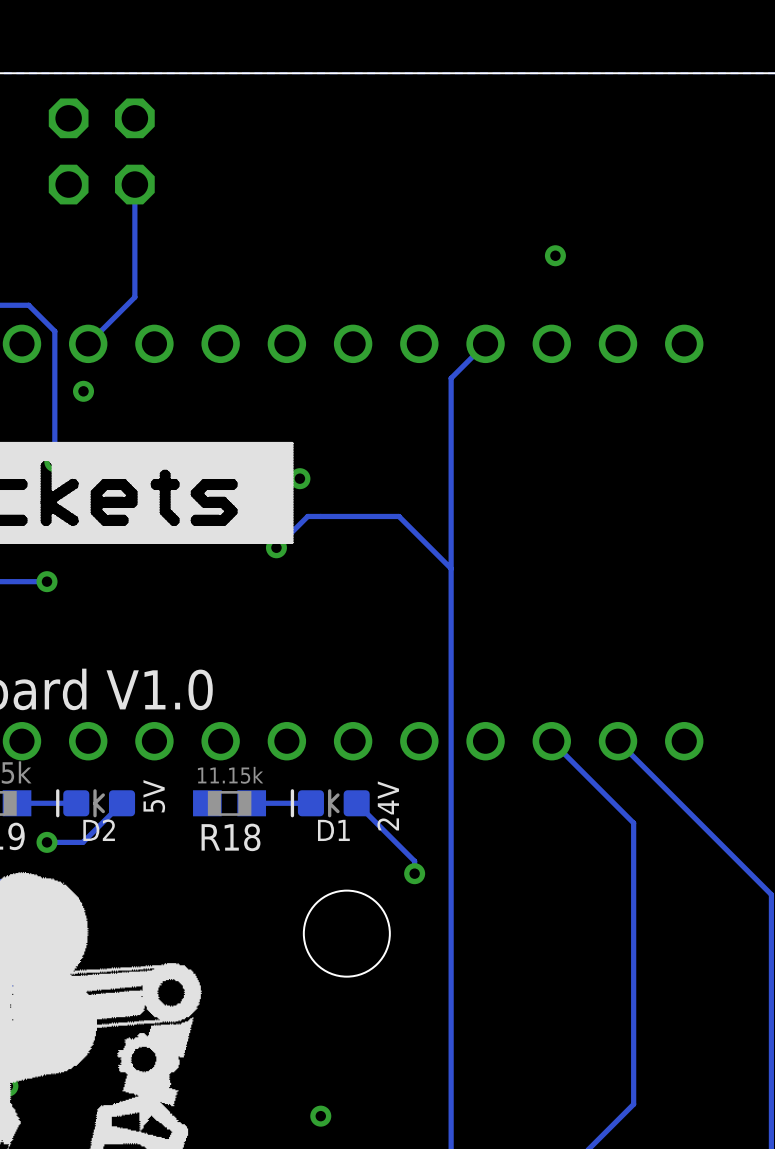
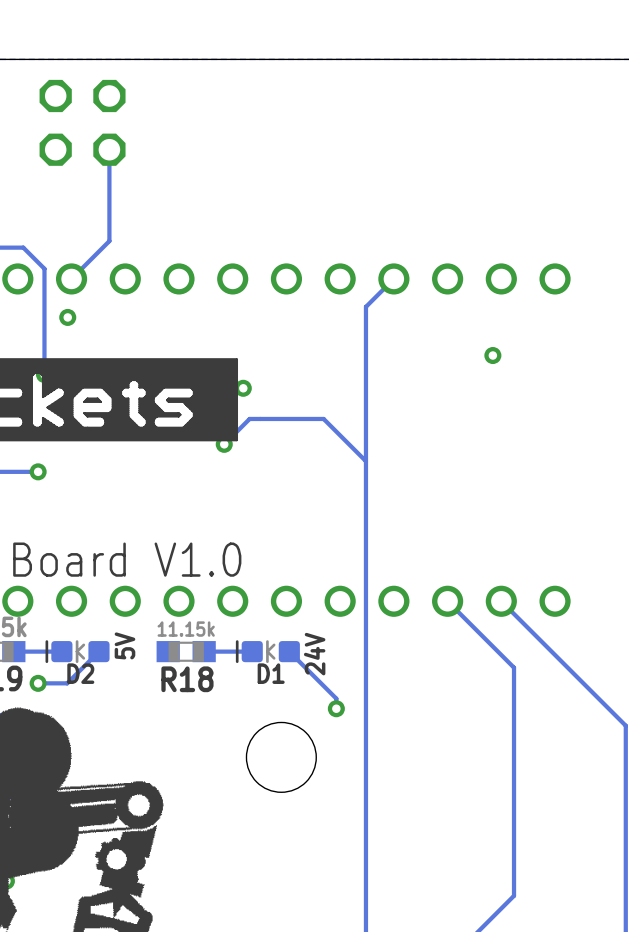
via: (555, 255) -> none
via: none -> (492, 355)
via: (320, 1116) -> none

